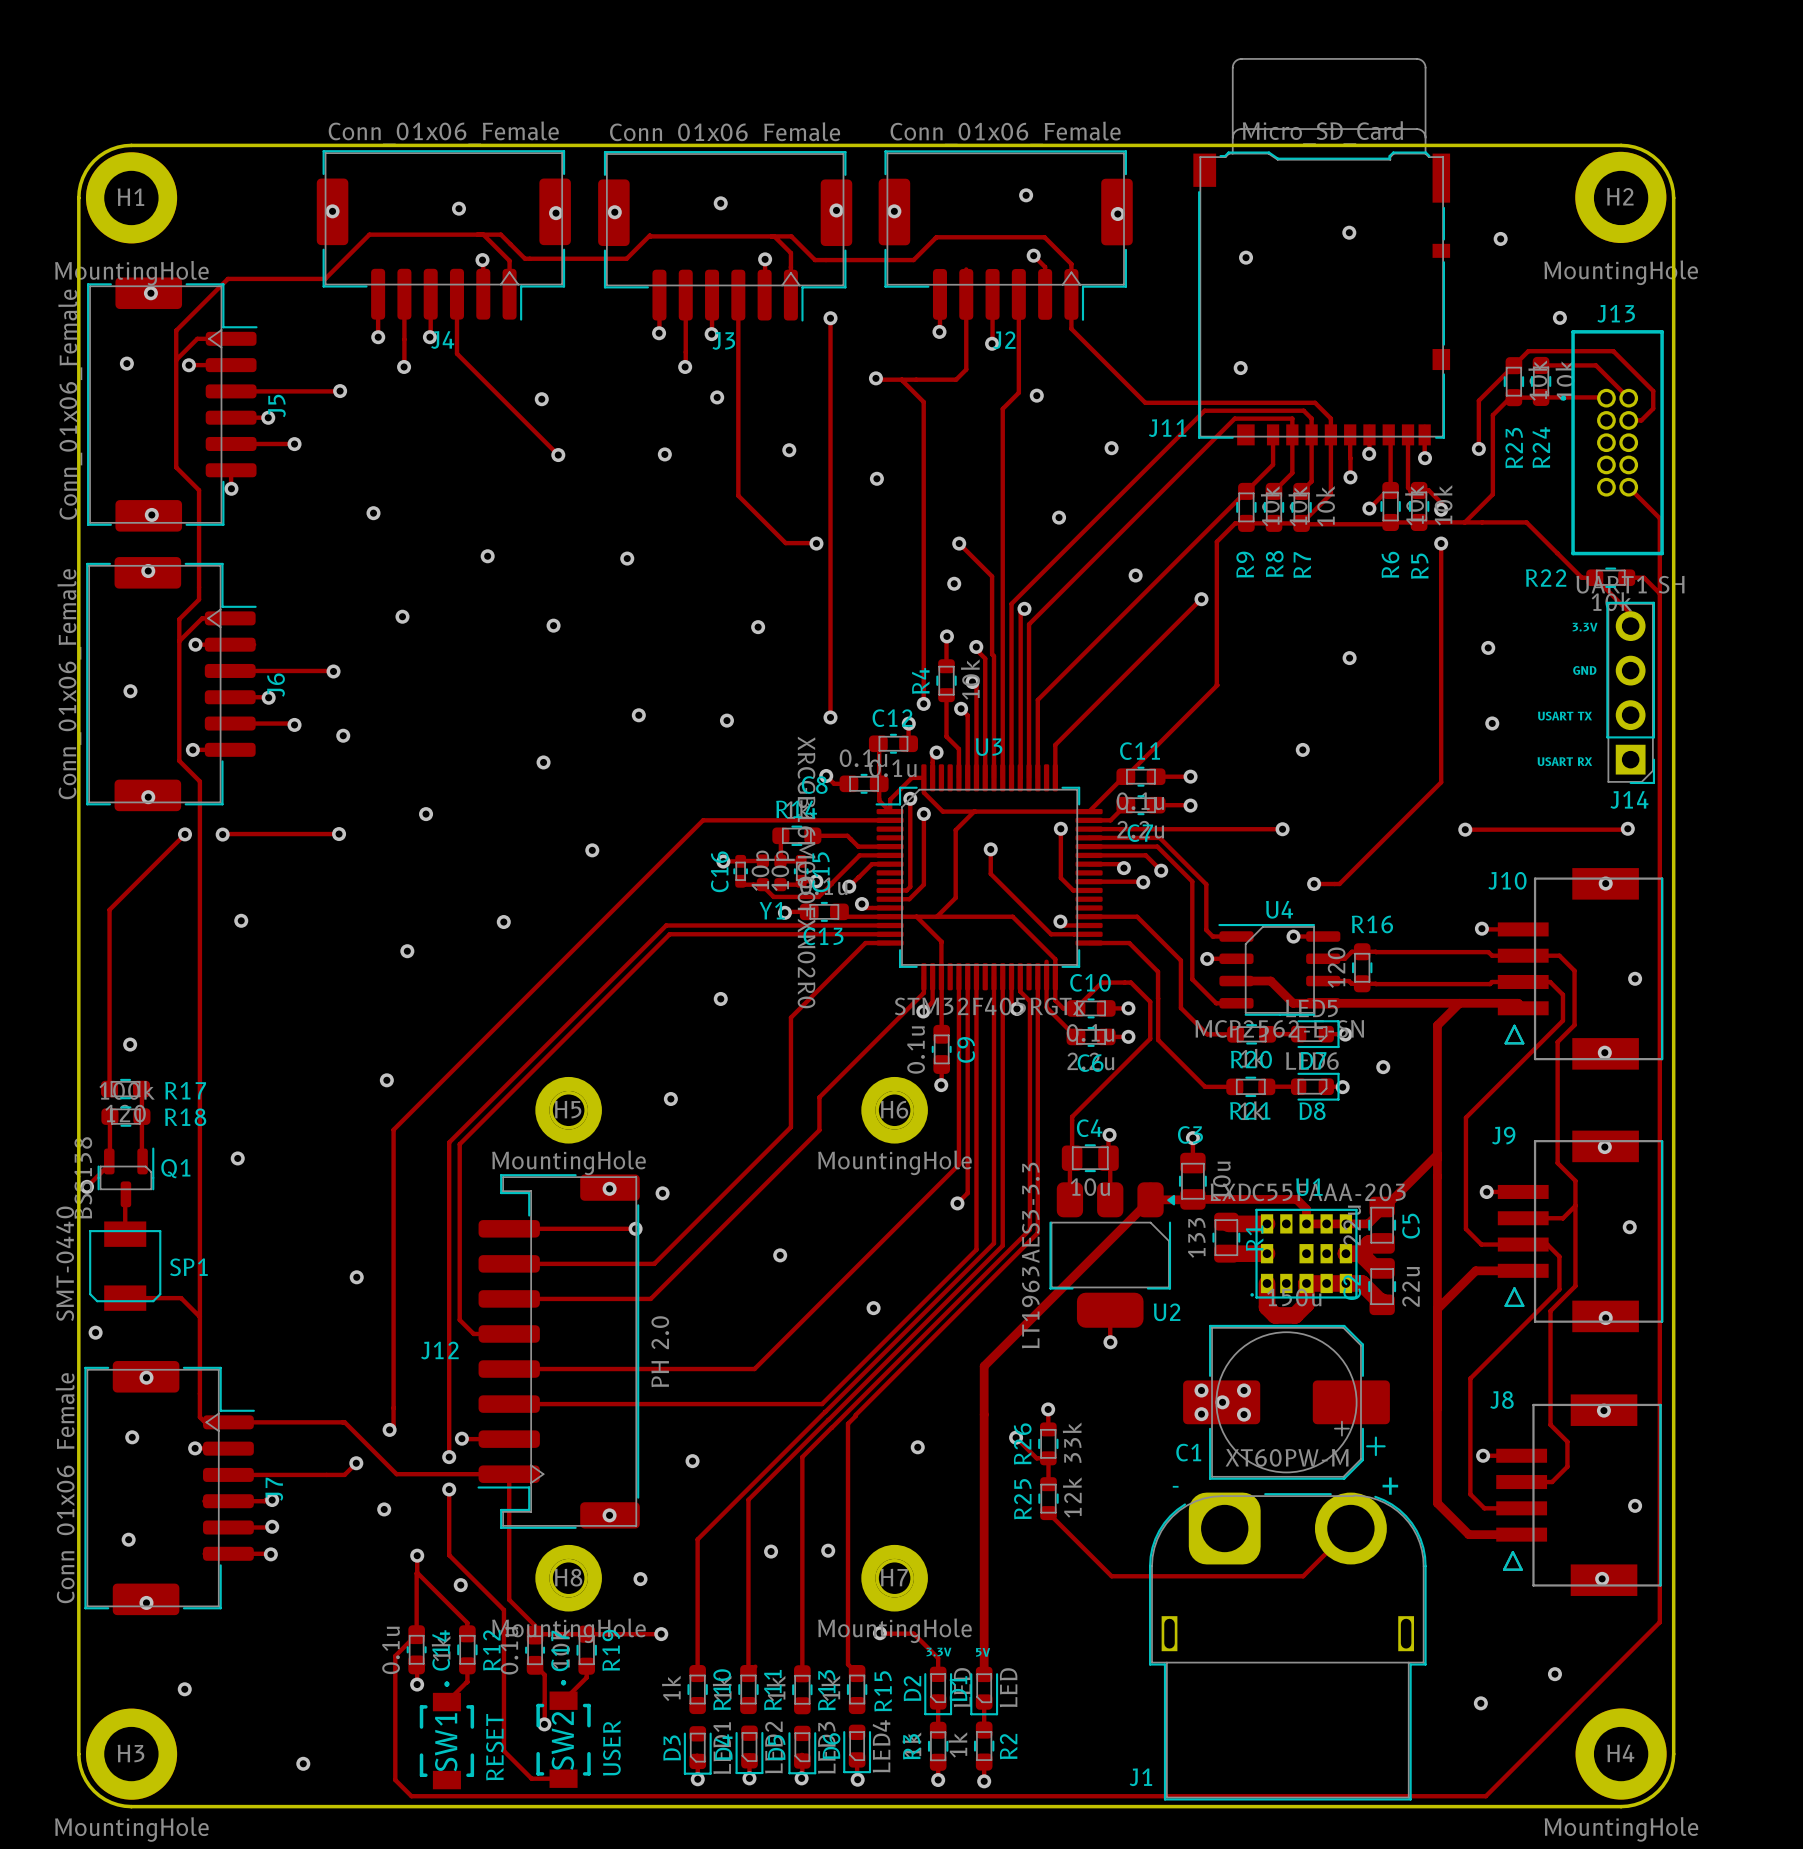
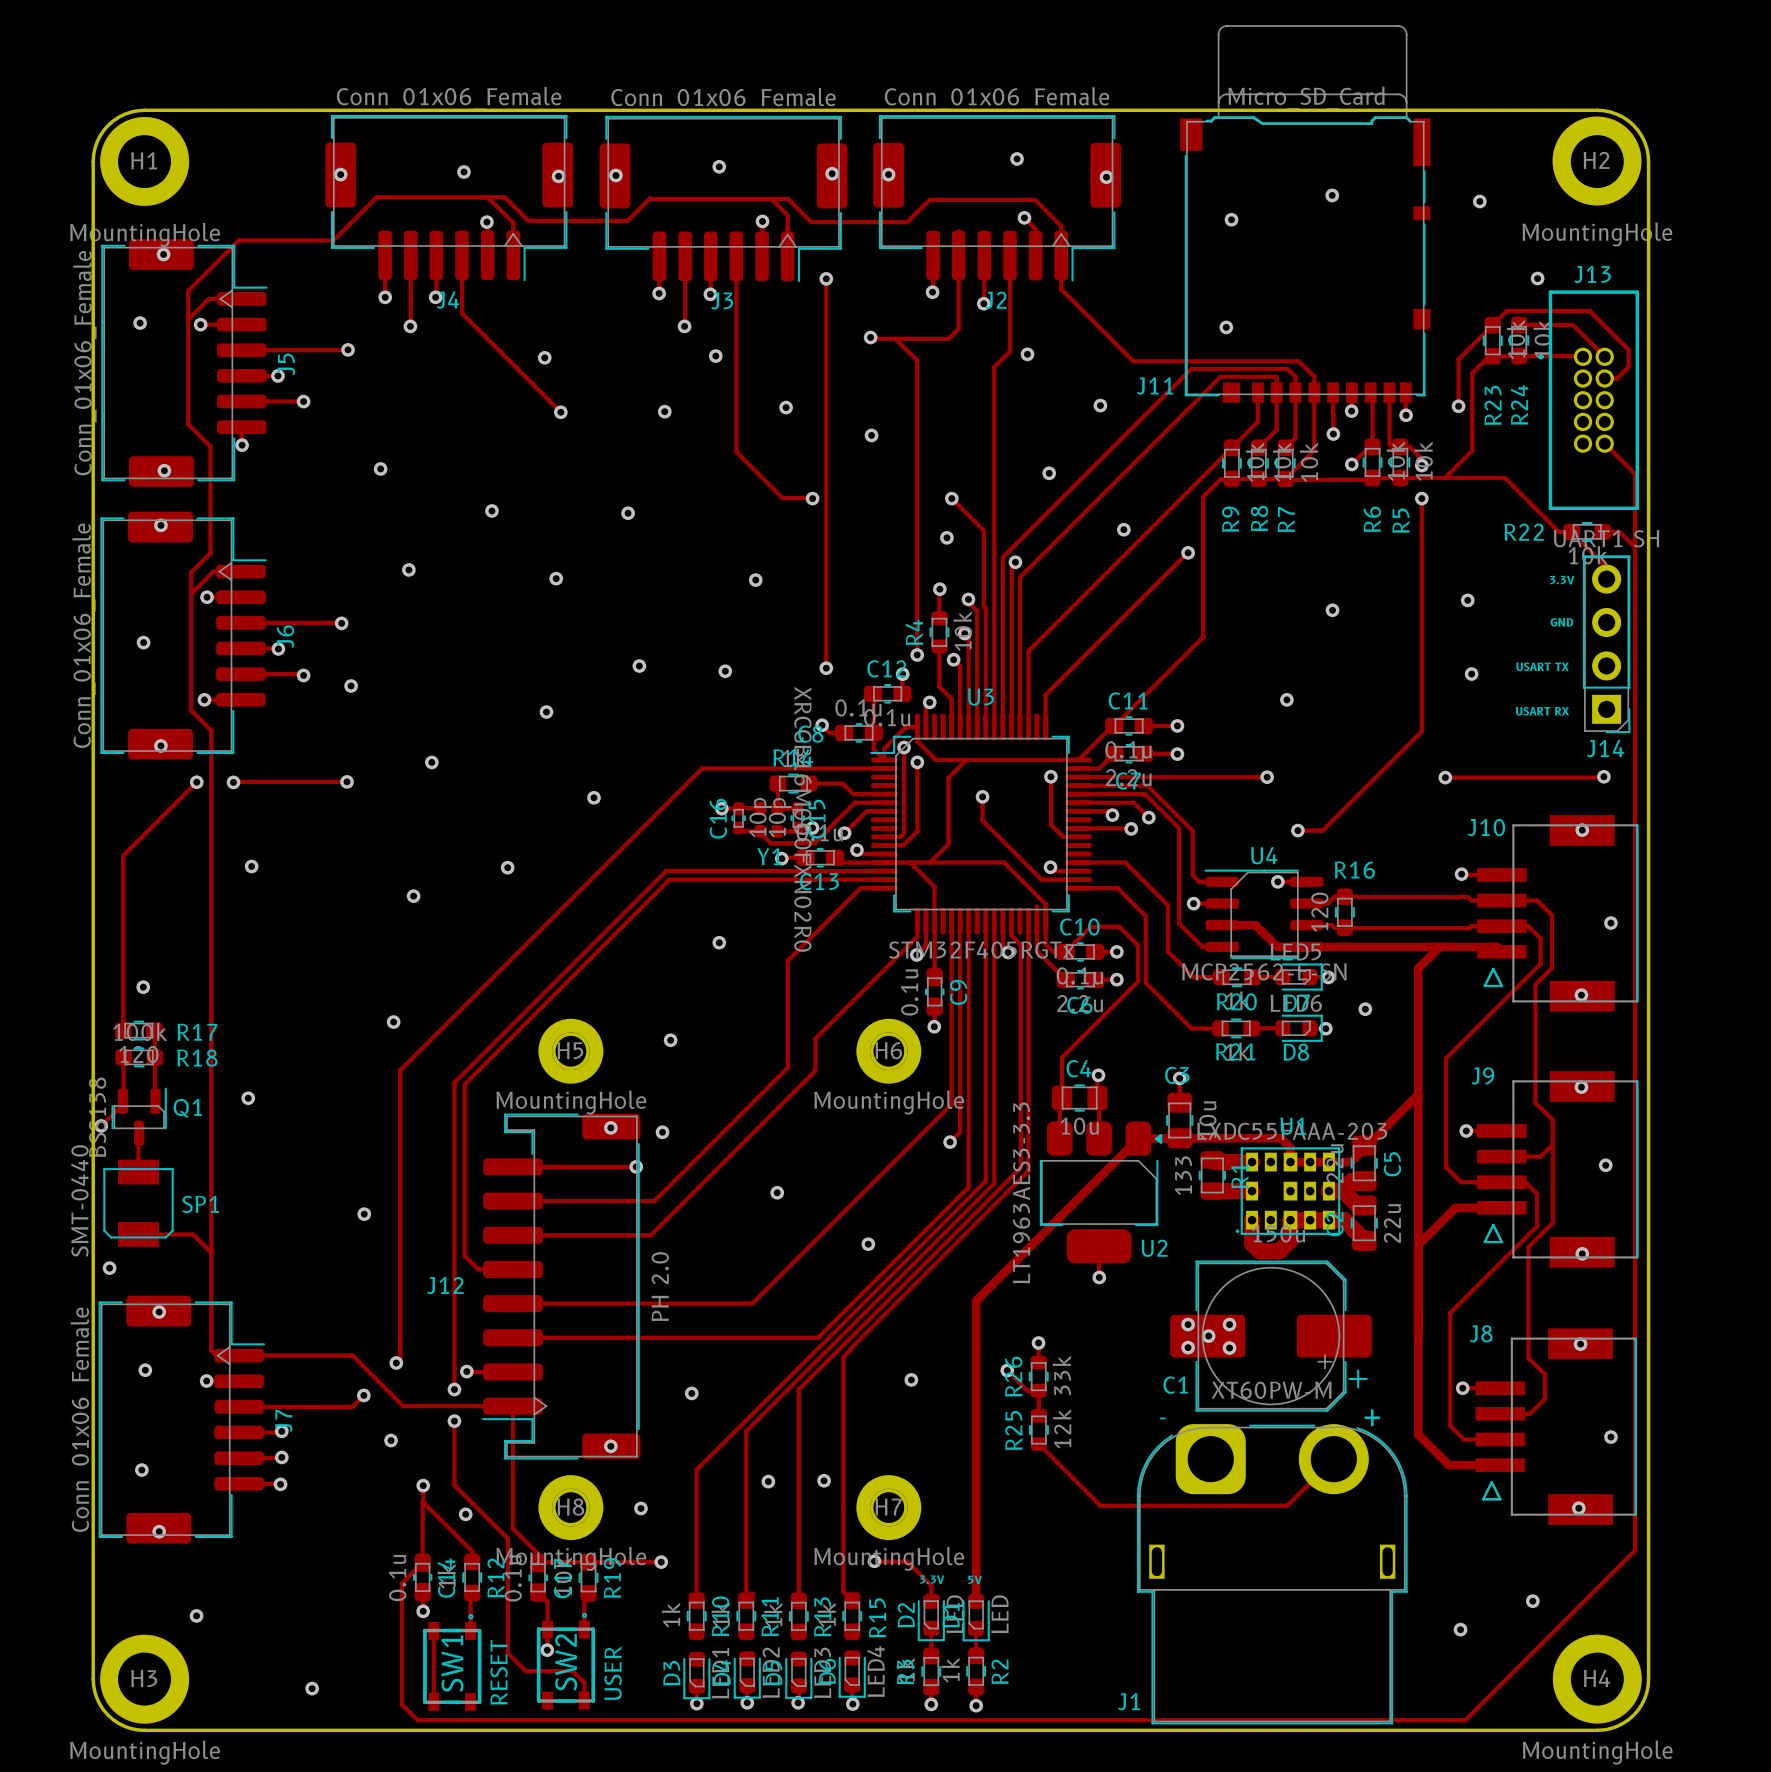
track: (467, 1665) (467, 1682) (446, 1702) -> none
track: (586, 1666) (586, 1677) (563, 1700) -> none
track: none -> (470, 1594) (470, 1630)
track: none -> (584, 1597) (584, 1629)
SW2 footprint: [536, 1680, 591, 1788] -> [536, 1612, 596, 1710]
SW1 footprint: [419, 1681, 475, 1790] -> [423, 1614, 482, 1711]
track: none -> (433, 1630) (433, 1701)
track: (503, 1727) (503, 1751) (531, 1778) (563, 1778) -> (507, 1653) (525, 1671) (572, 1671) (584, 1682) (584, 1700)

